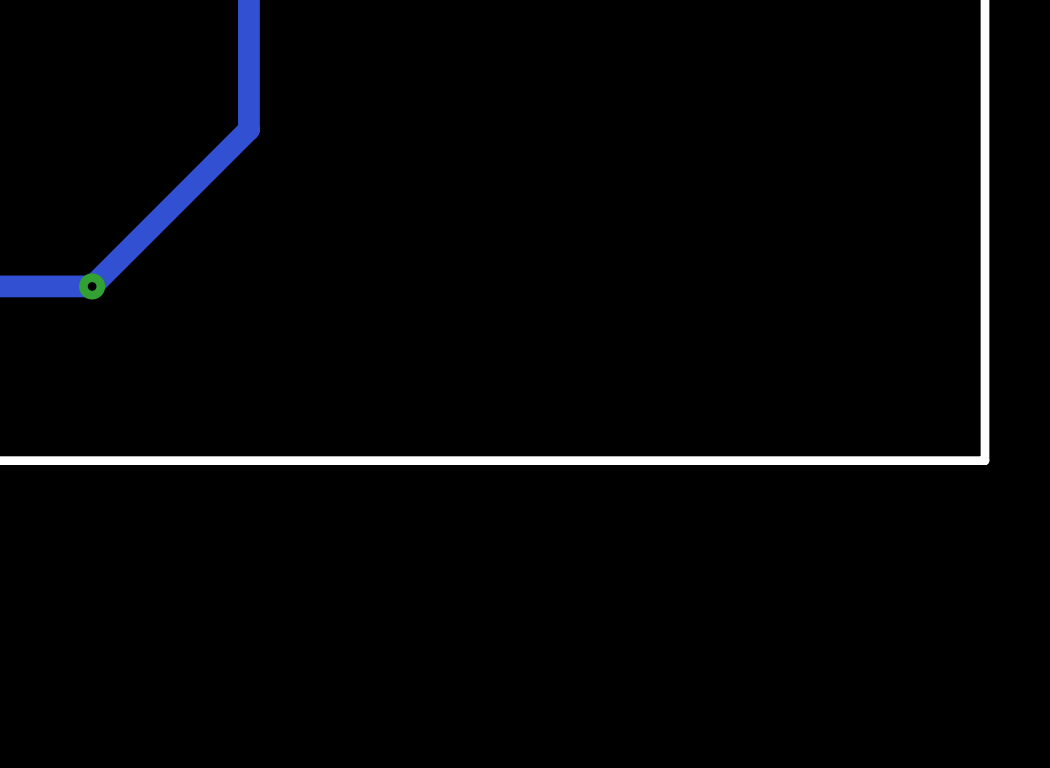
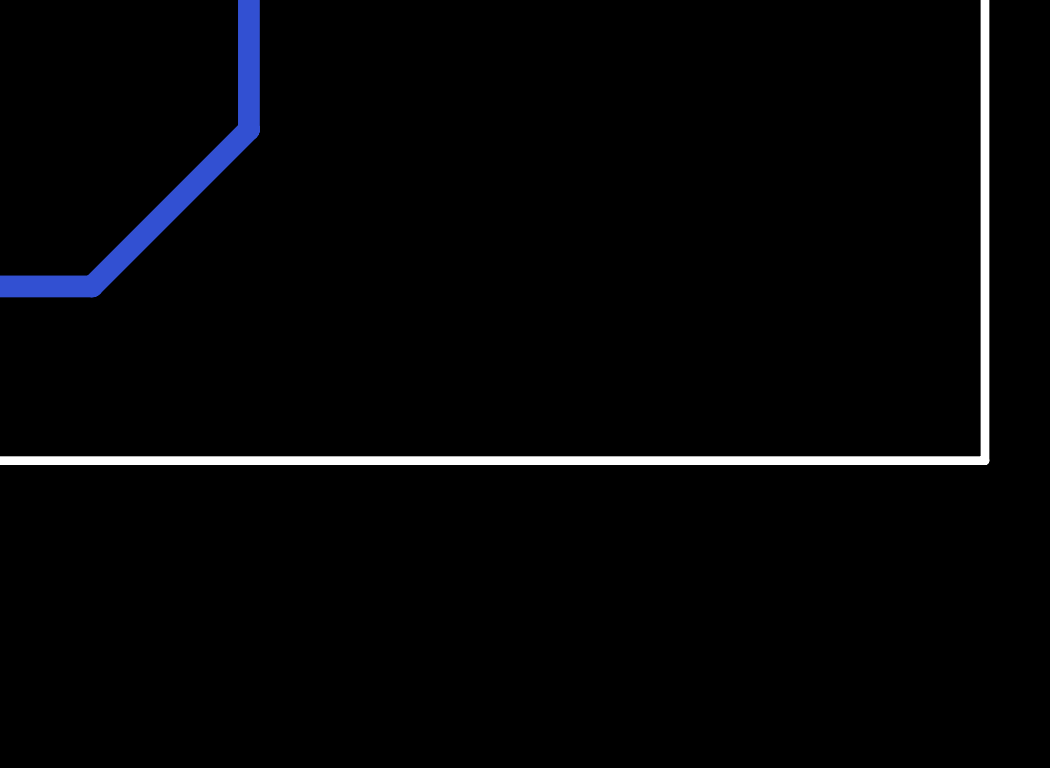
via: (92, 286) -> none

